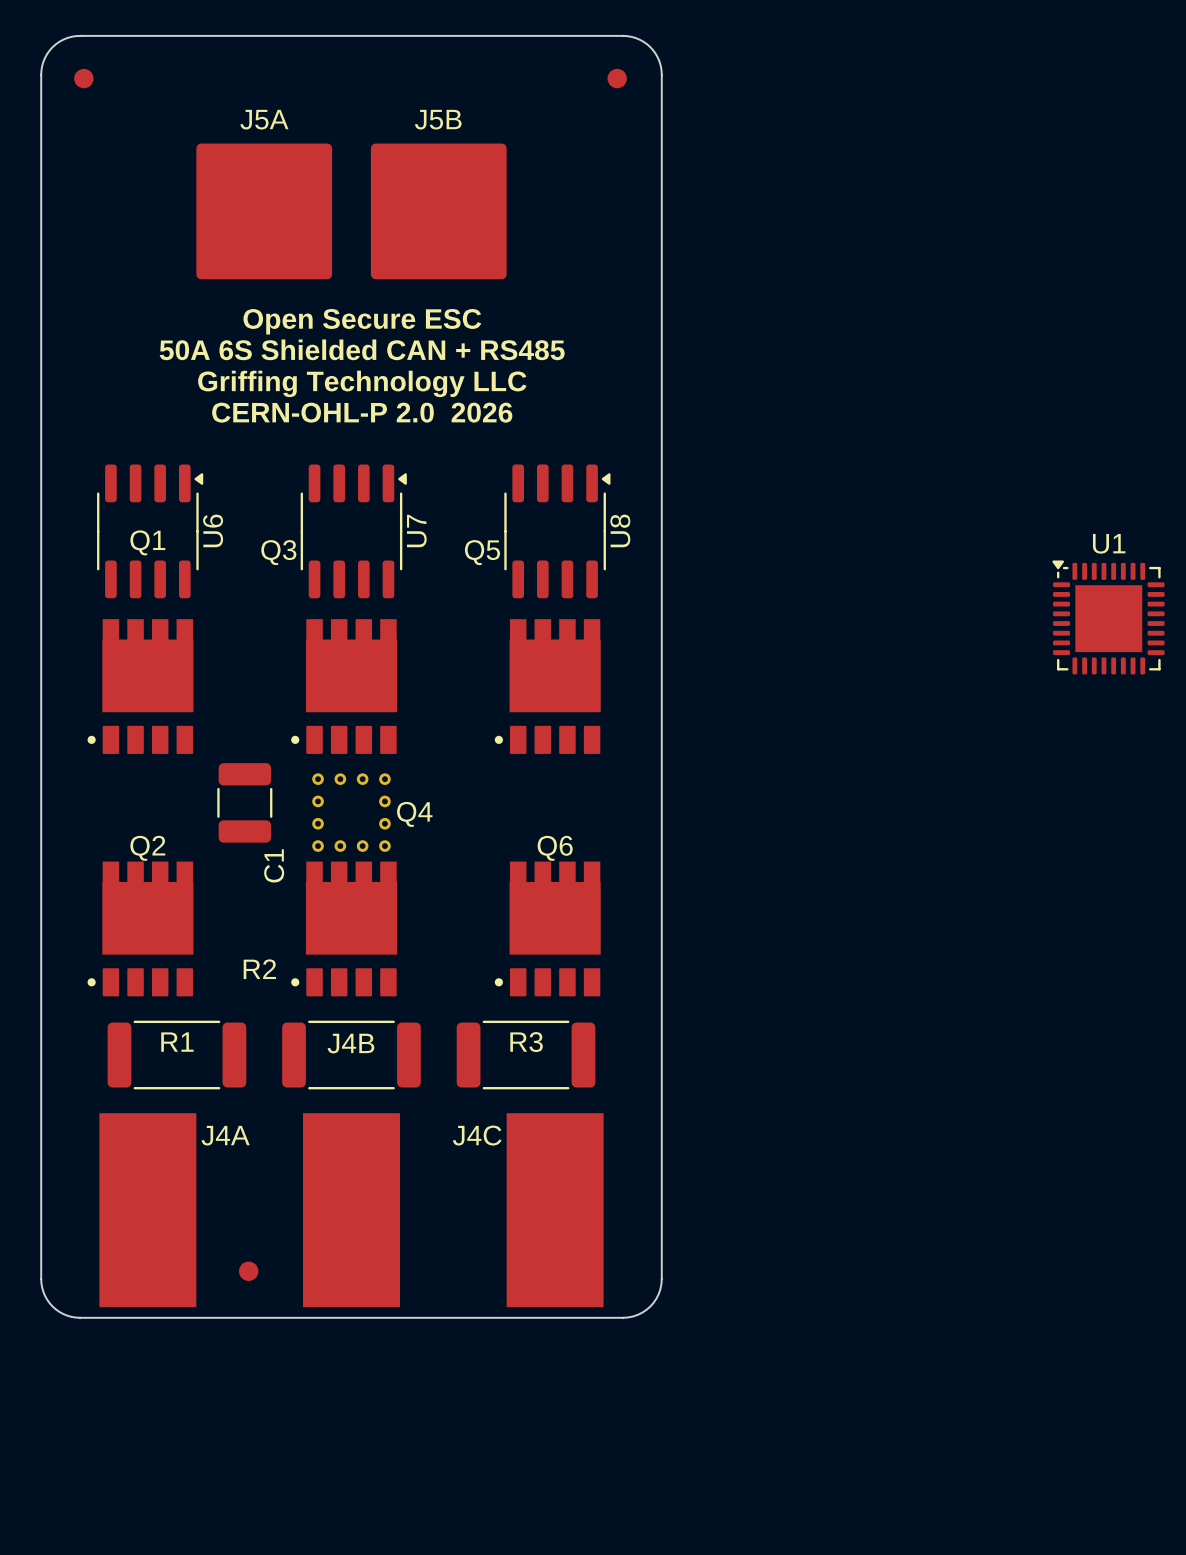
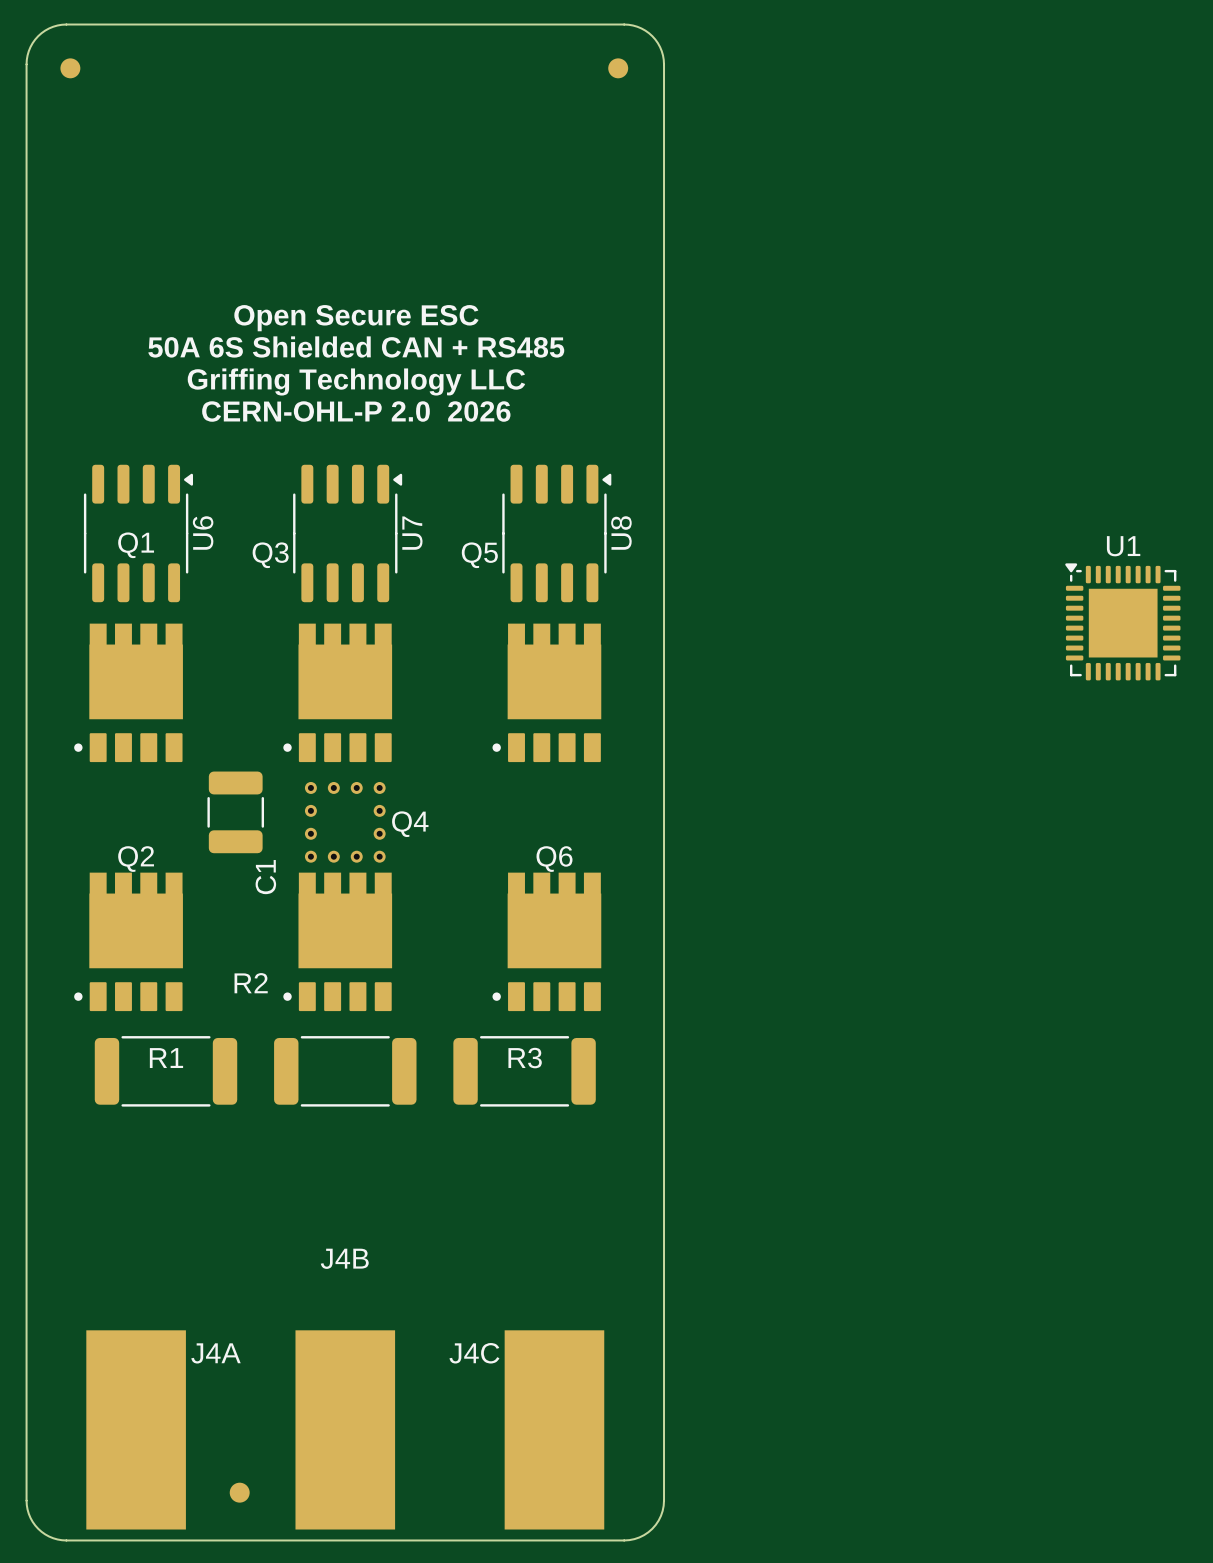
J5A: (264, 211) -> none
J5B: (438, 211) -> none
J4A position: (147, 1210) -> (136, 1429)
J4B position: (351, 1210) -> (345, 1429)
J4C position: (555, 1210) -> (554, 1429)
part position: (248, 1271) -> (239, 1492)
board edge: (41, 1279) (43, 1291) (52, 1306) (63, 1313) (79, 1317) (628, 1317) (642, 1312) (650, 1306) (658, 1293) (661, 1279) -> (26, 1301) (26, 1505) (30, 1517) (41, 1531) (53, 1538) (66, 1540) (624, 1540) (639, 1537) (655, 1524) (663, 1505) (664, 1301)

